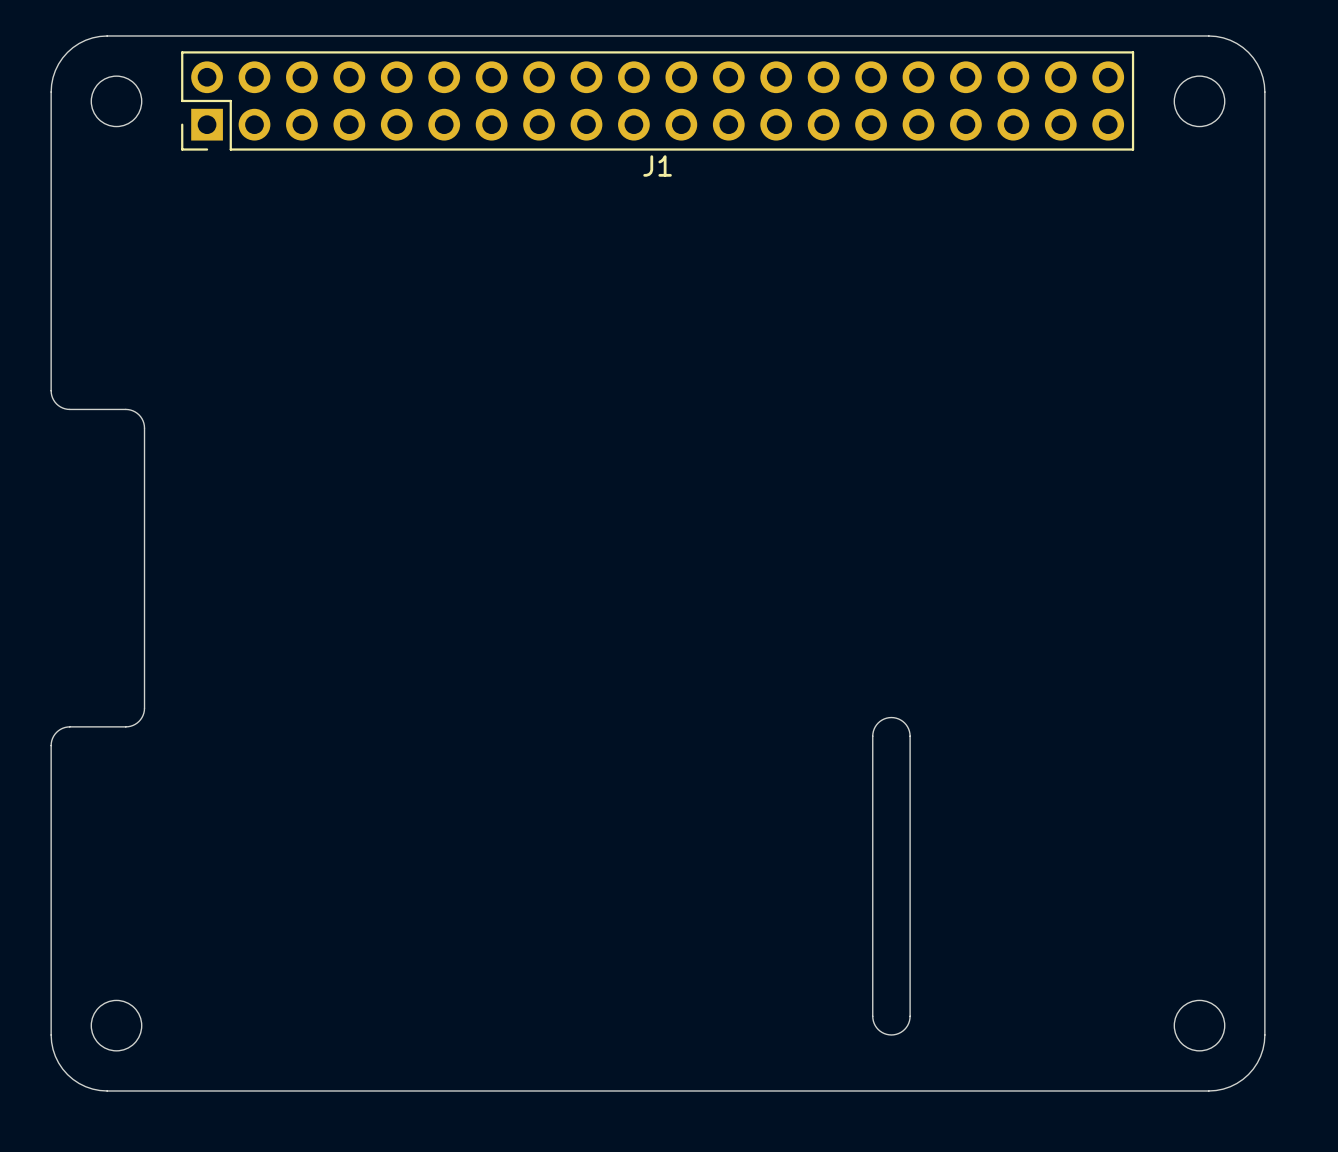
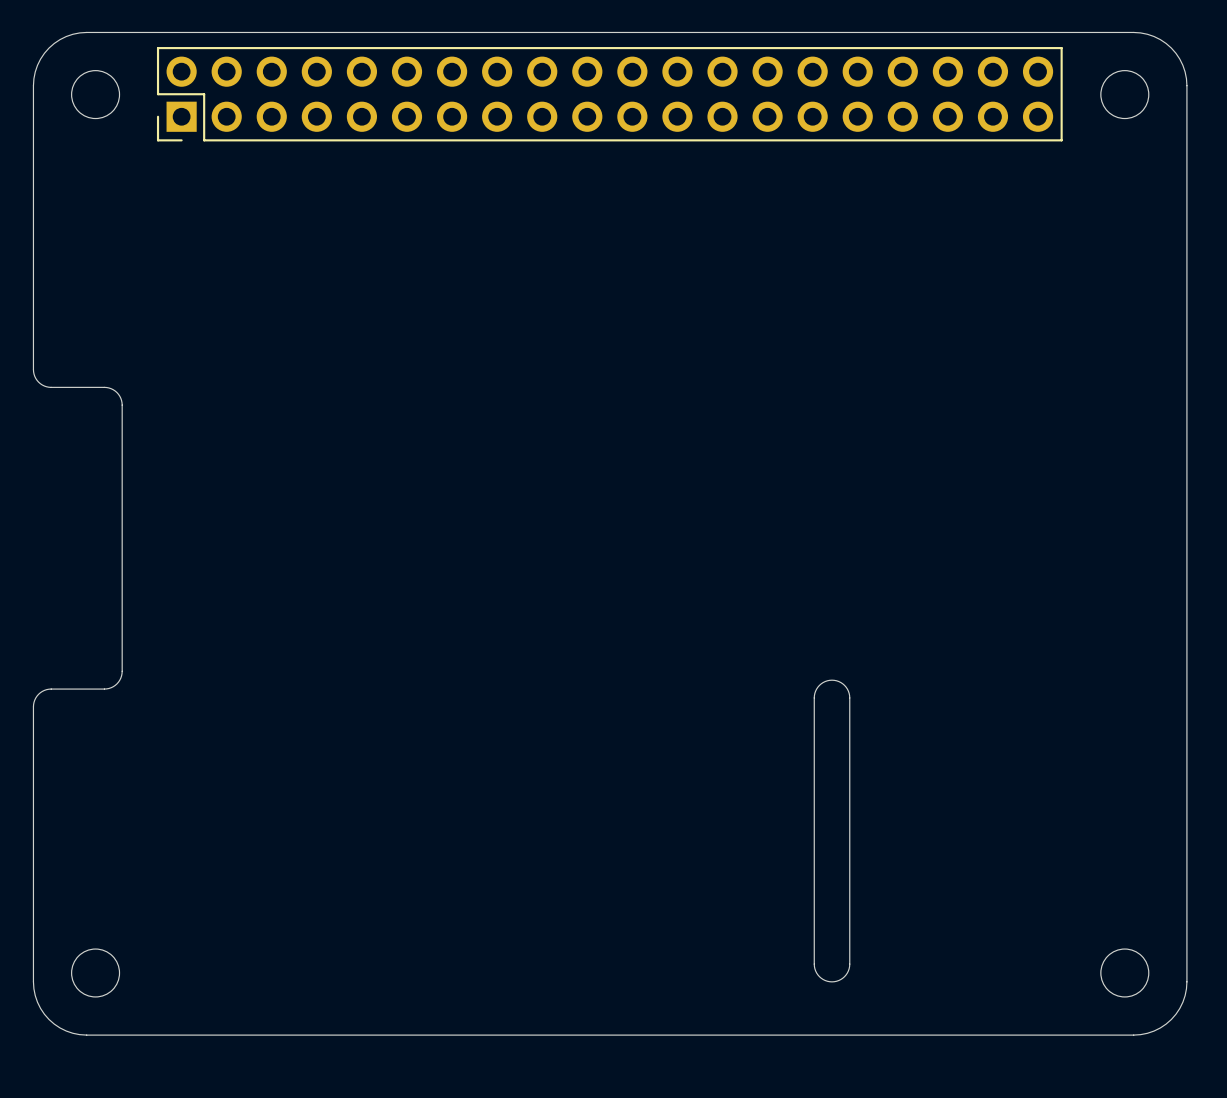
J1 name: J1 (657, 165) -> none

